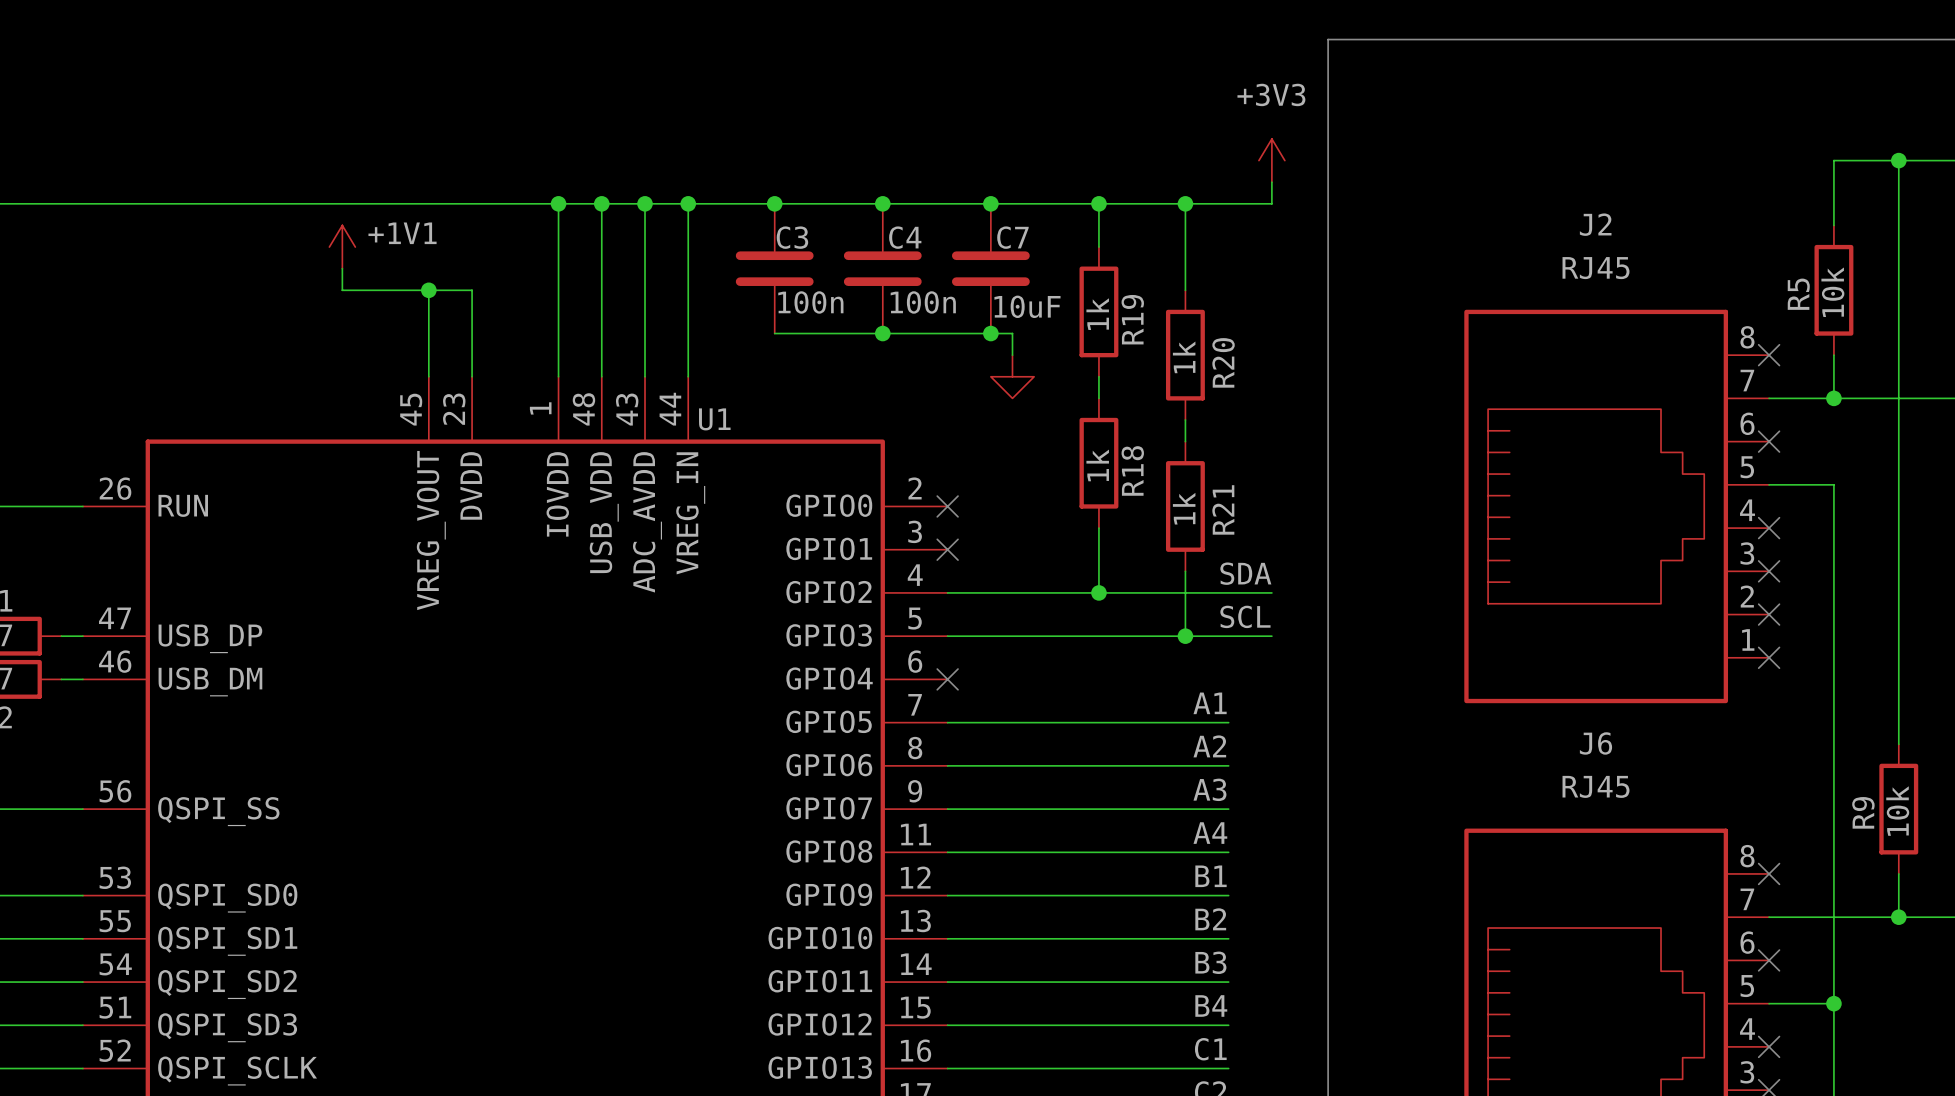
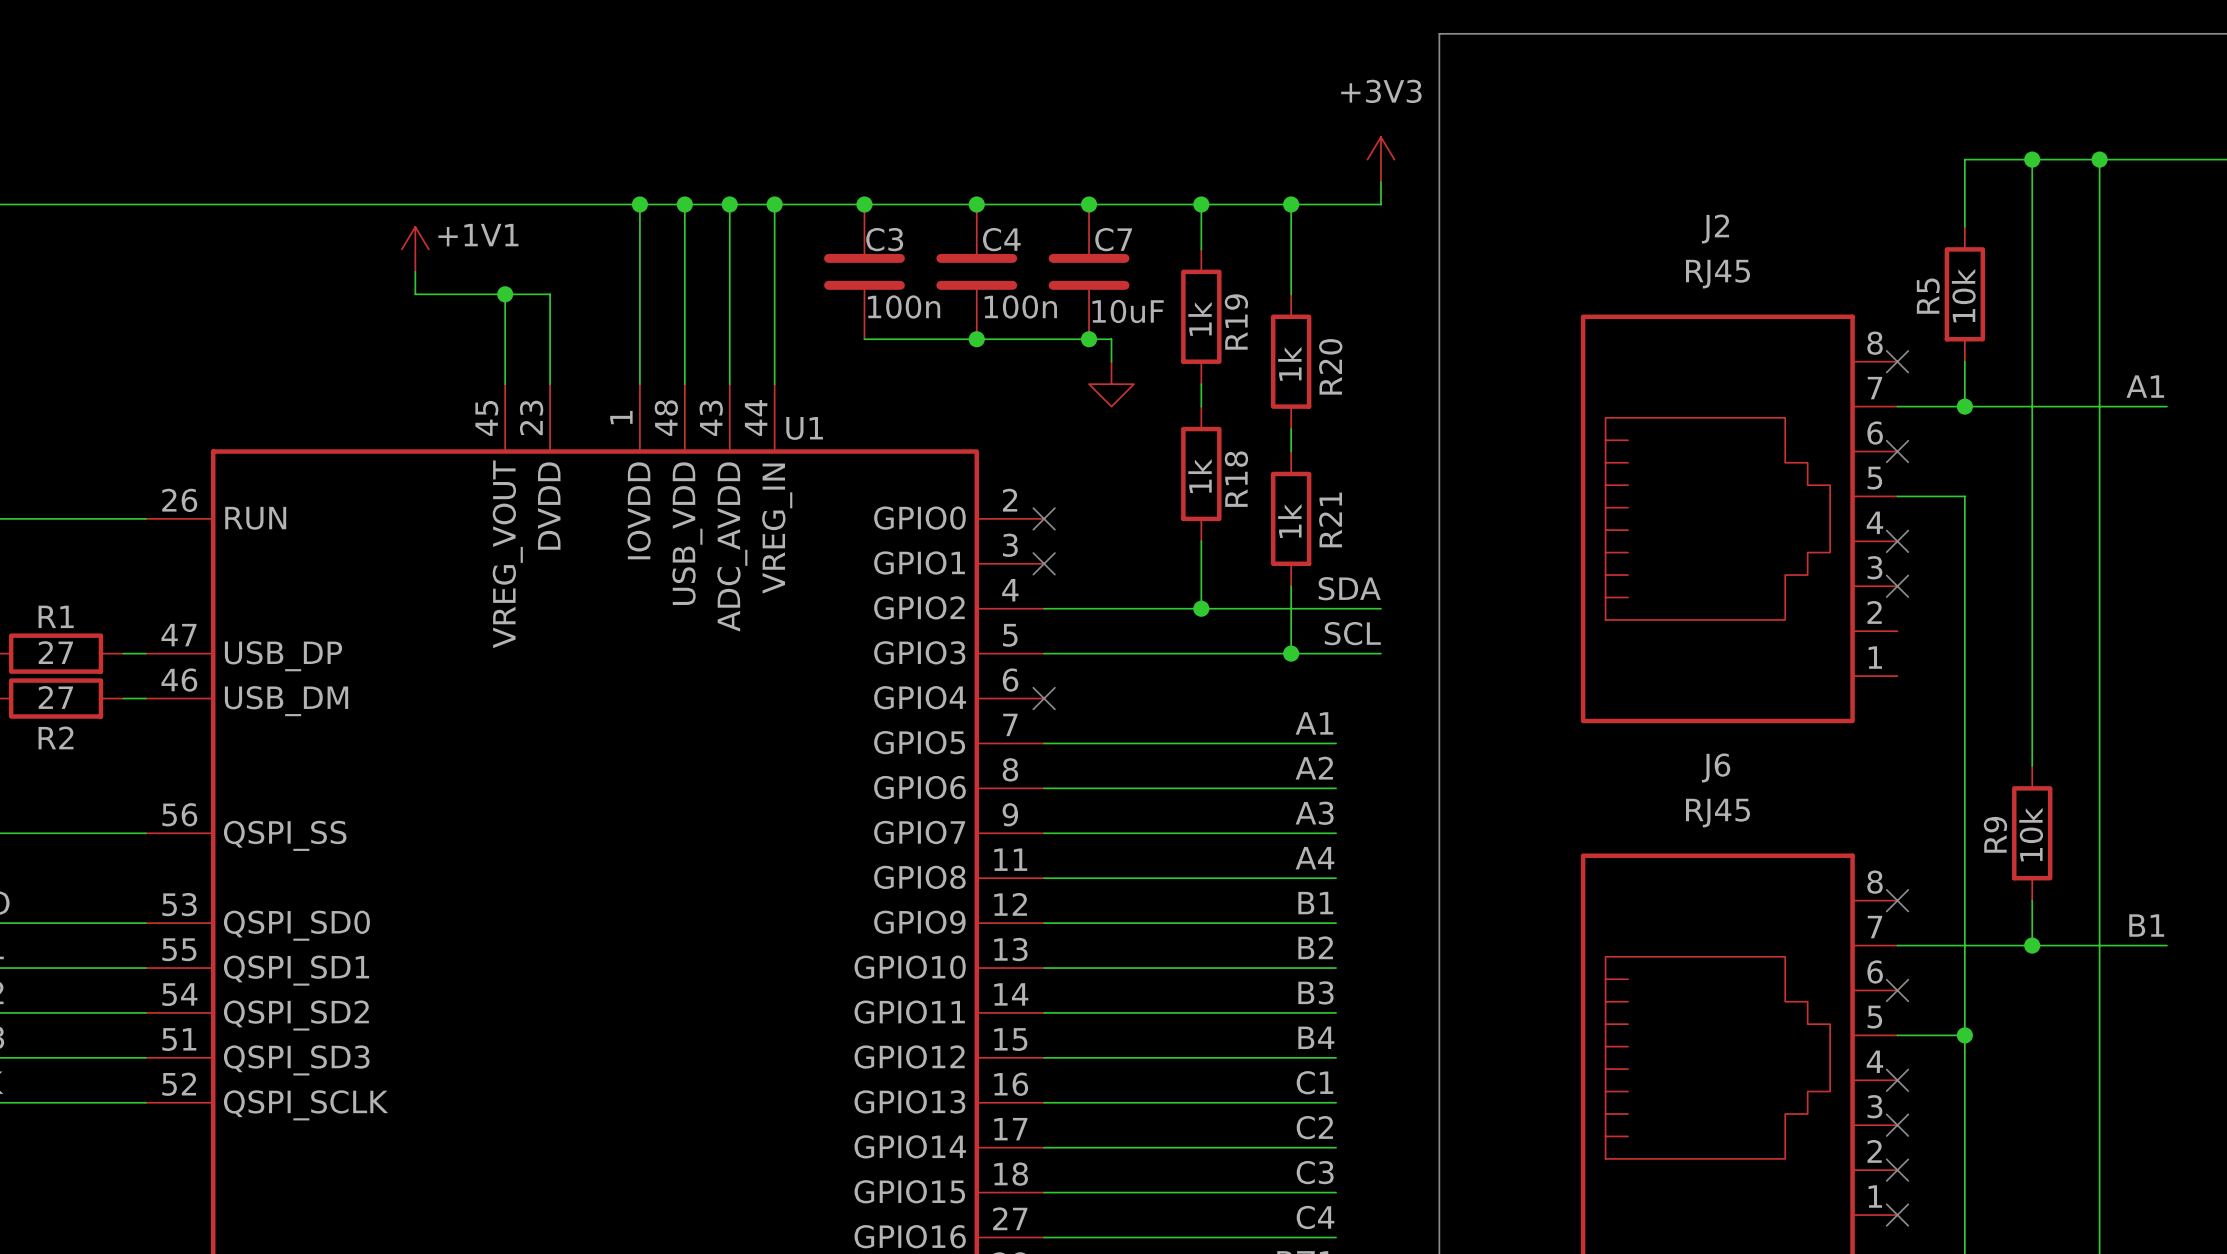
no-connect mark: (1769, 614) -> none
no-connect mark: (1769, 657) -> none

